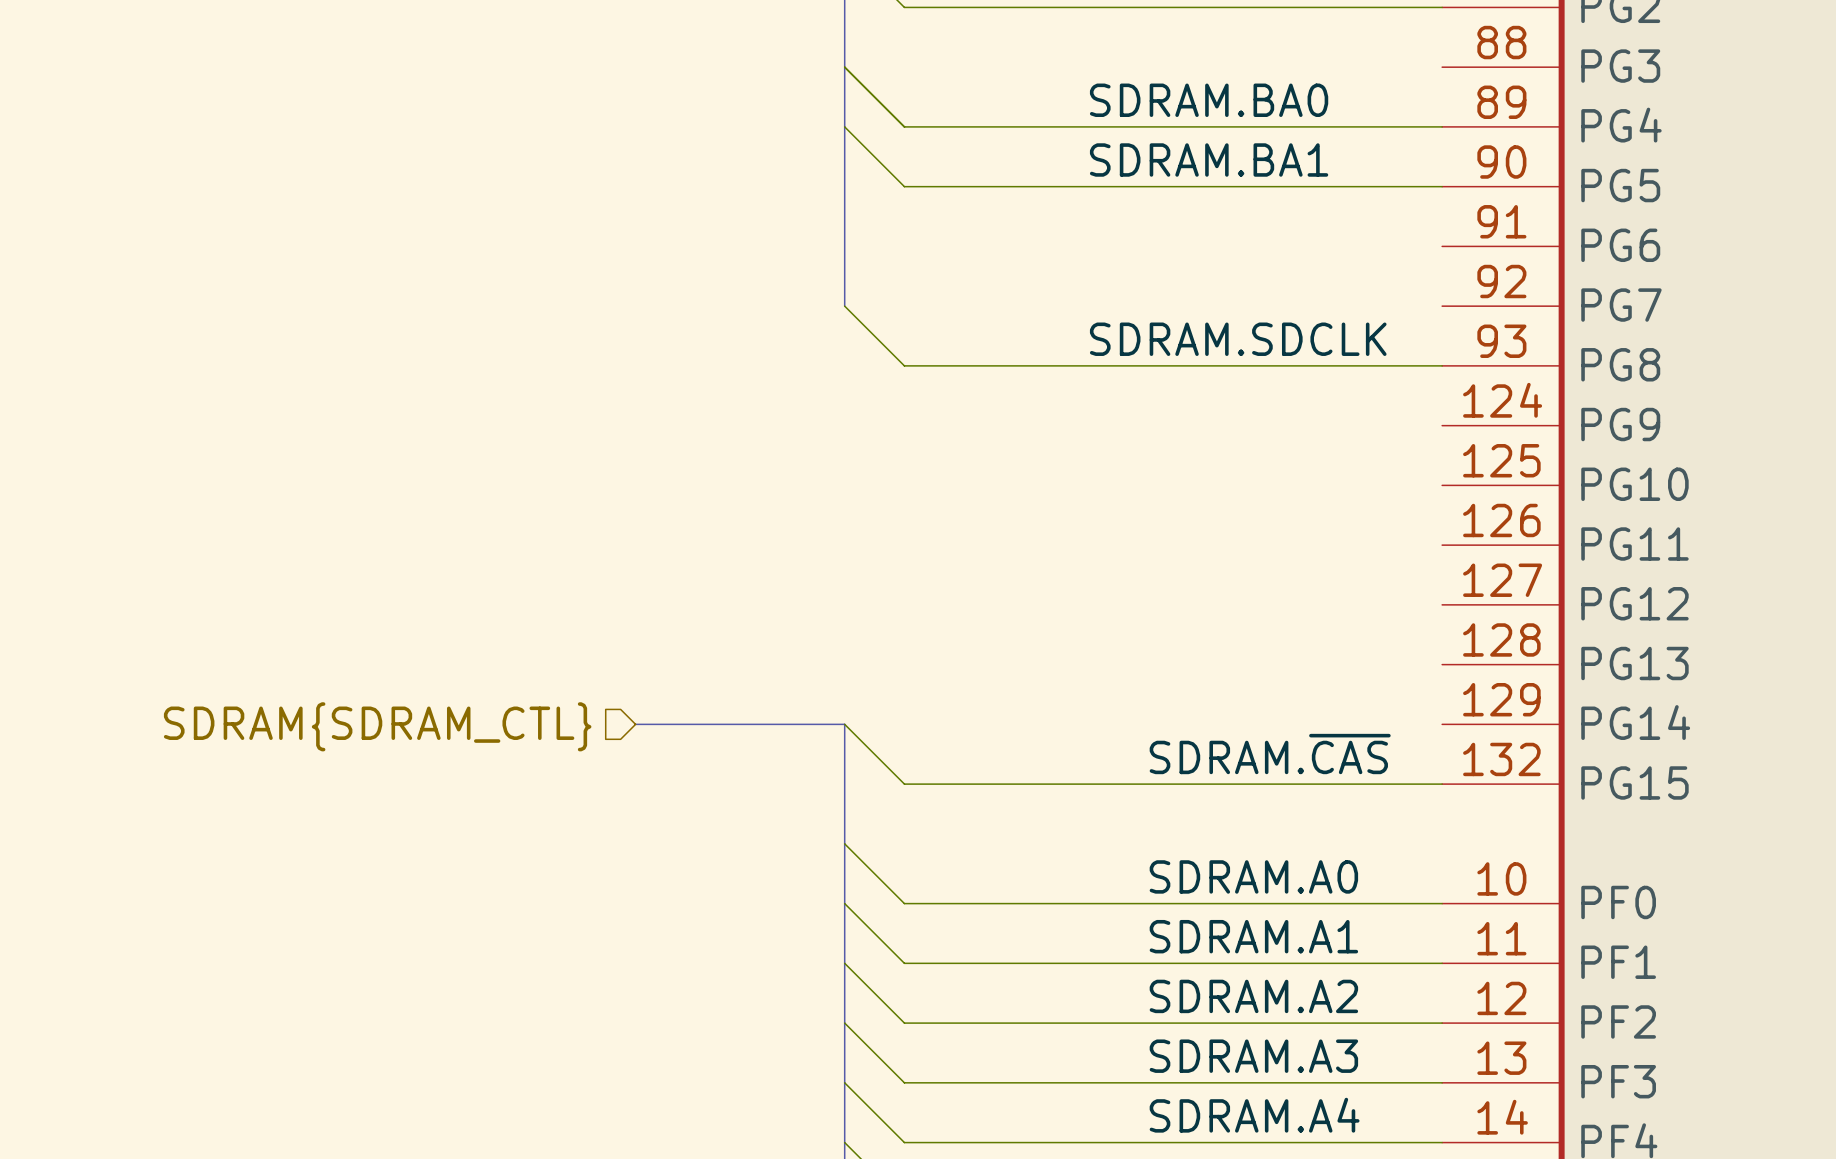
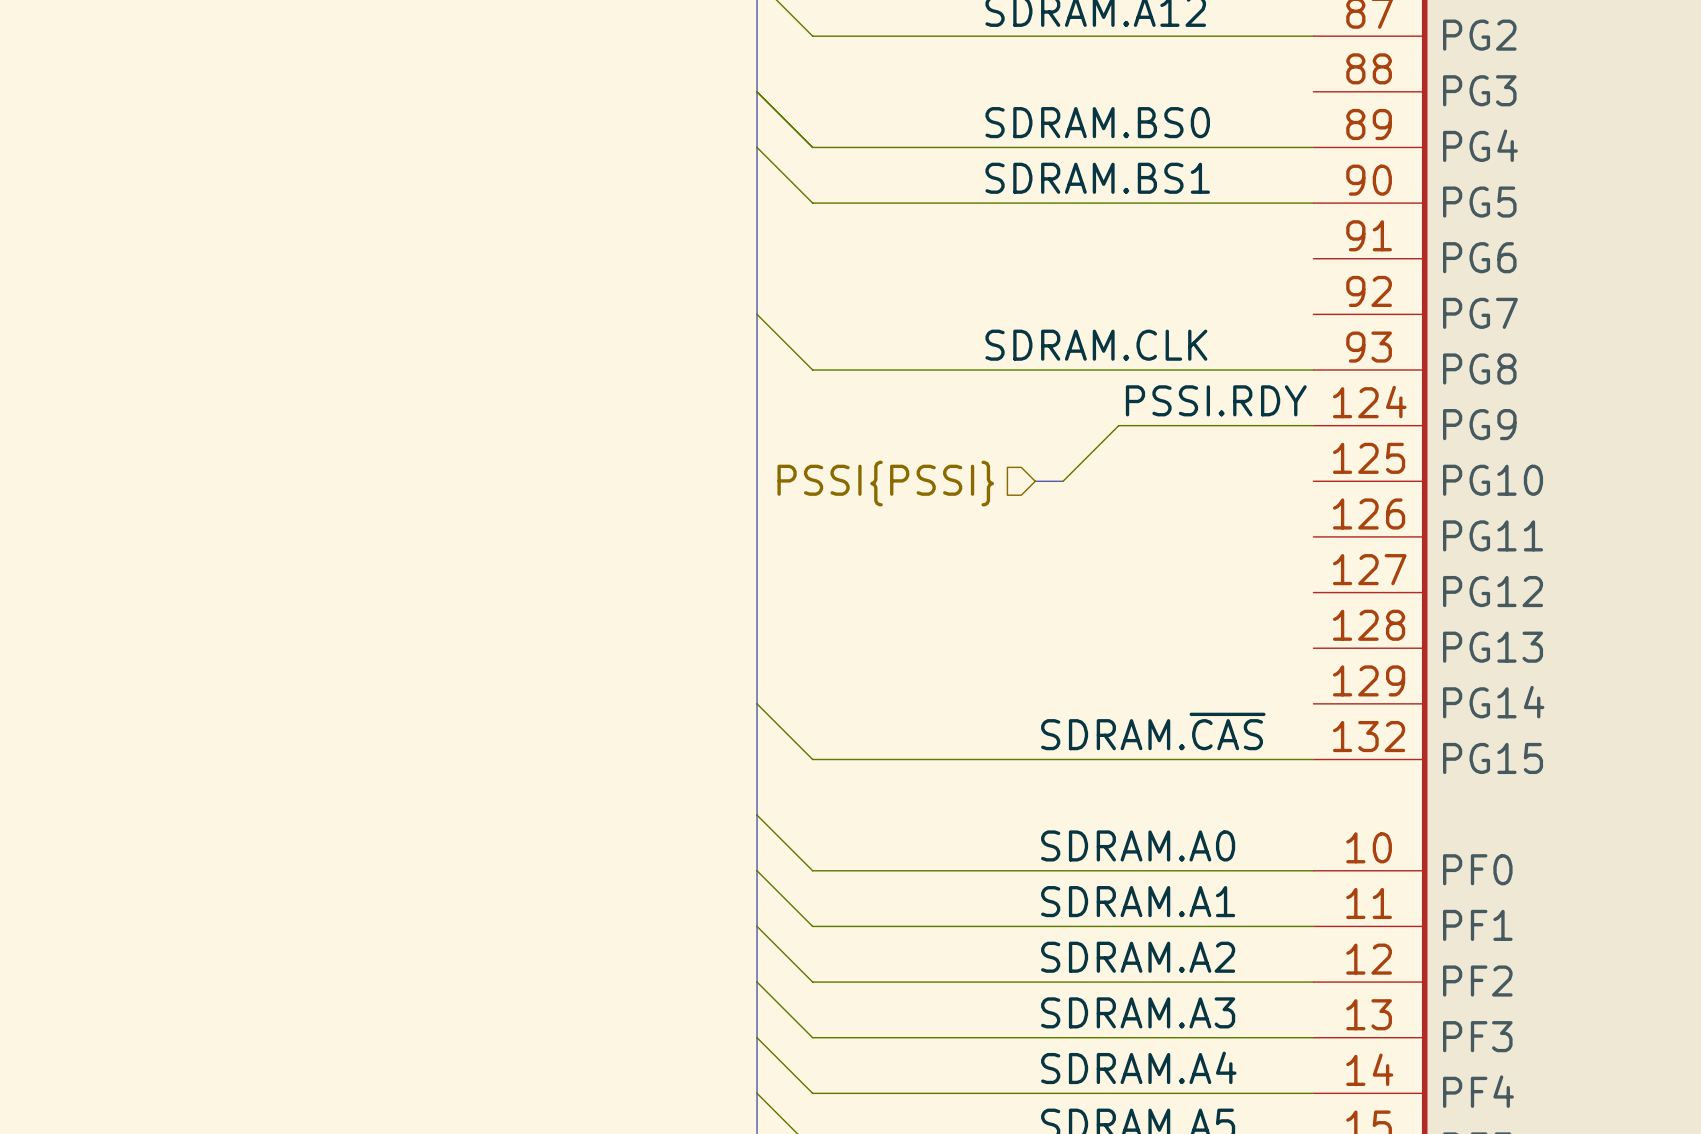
label: SDRAM.BA0 (1209, 100) -> SDRAM.BS0 (1097, 122)
label: SDRAM.BA1 (1209, 160) -> SDRAM.BS1 (1097, 178)
label: SDRAM.SDCLK (1238, 339) -> SDRAM.CLK (1096, 345)
label: none -> PSSI.RDY (1216, 400)
wire: none -> (1313, 425) (1118, 425) (1063, 481)
bus: none -> (1035, 481) (1063, 481)
hierarchical label: none -> PSSI{PSSI} (885, 483)
bus: (635, 724) (844, 724) -> (757, 314) (757, 703)
hierarchical label: SDRAM{SDRAM_CTL} (377, 726) -> none

